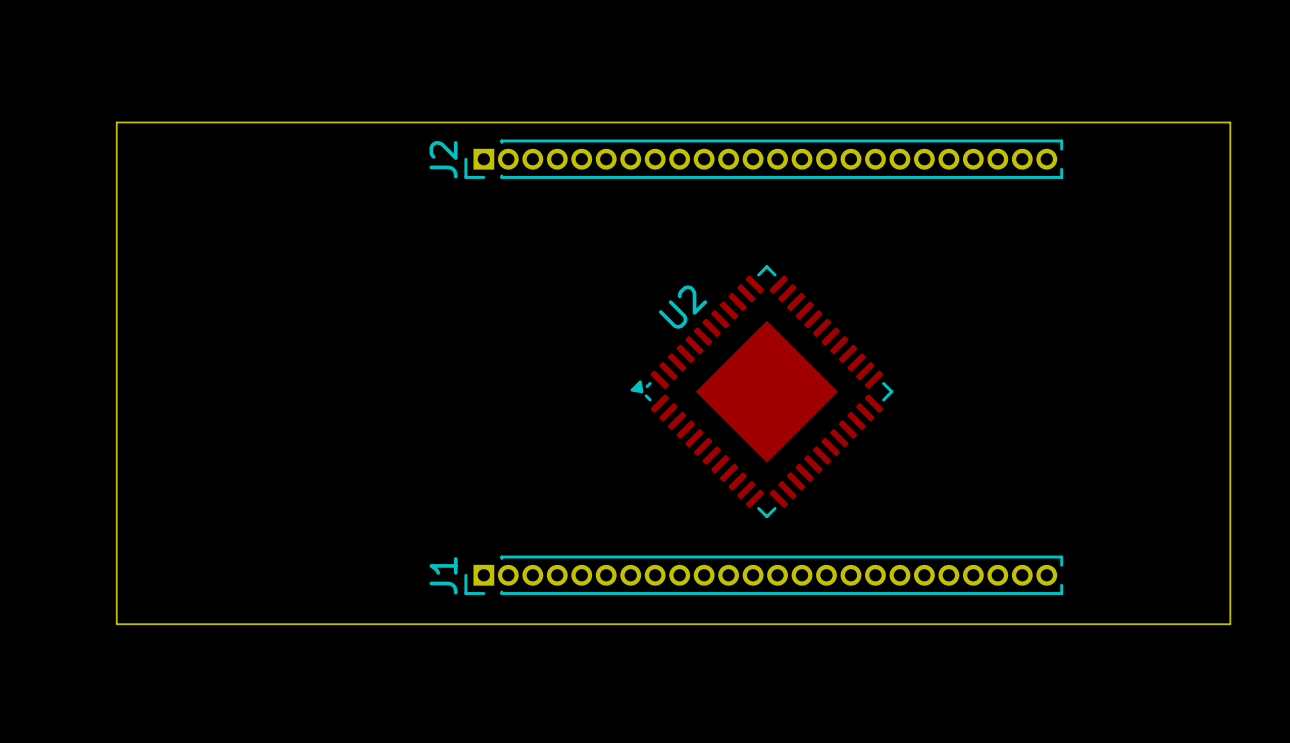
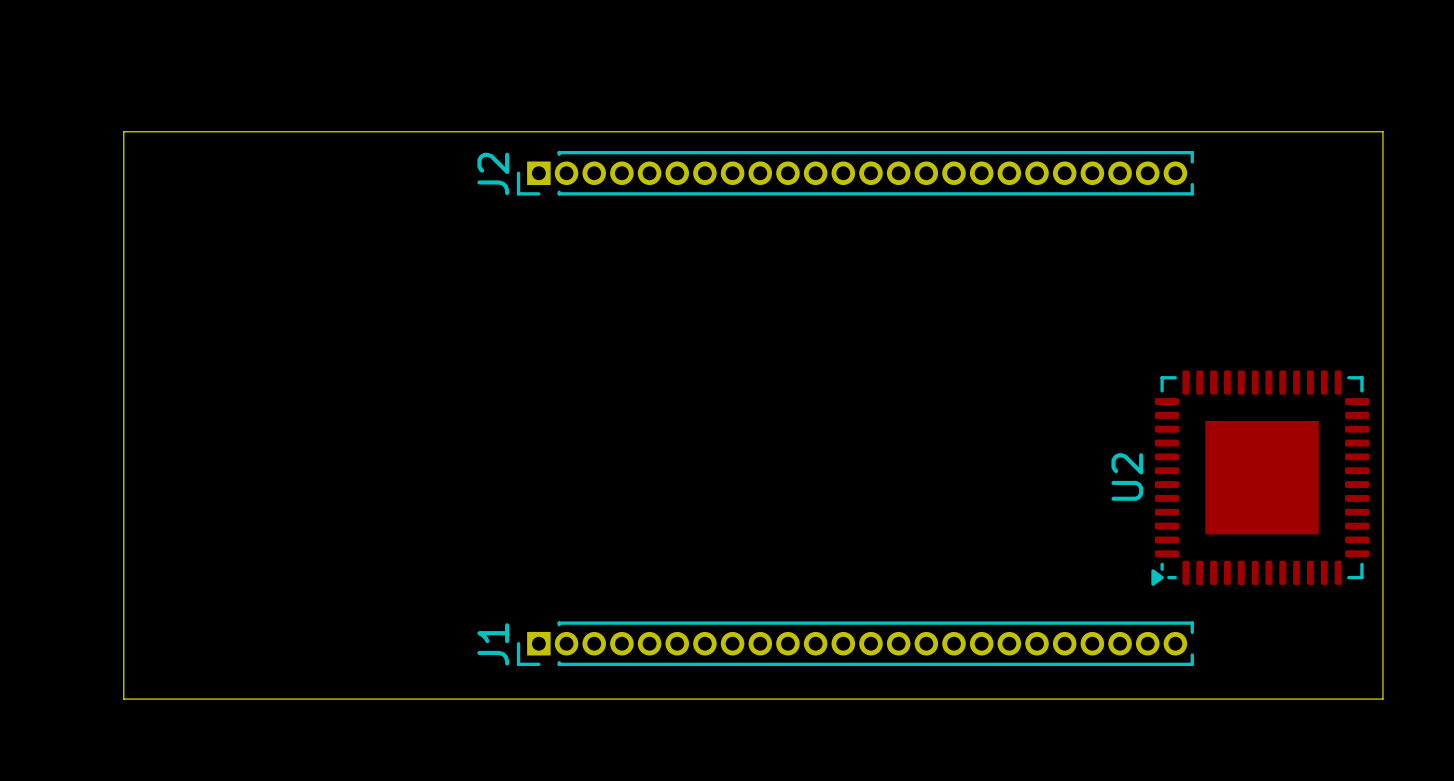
U2 rotation: 0° (761, 391) -> 45° counterclockwise (1260, 478)
U2 position: (761, 391) -> (1260, 478)

